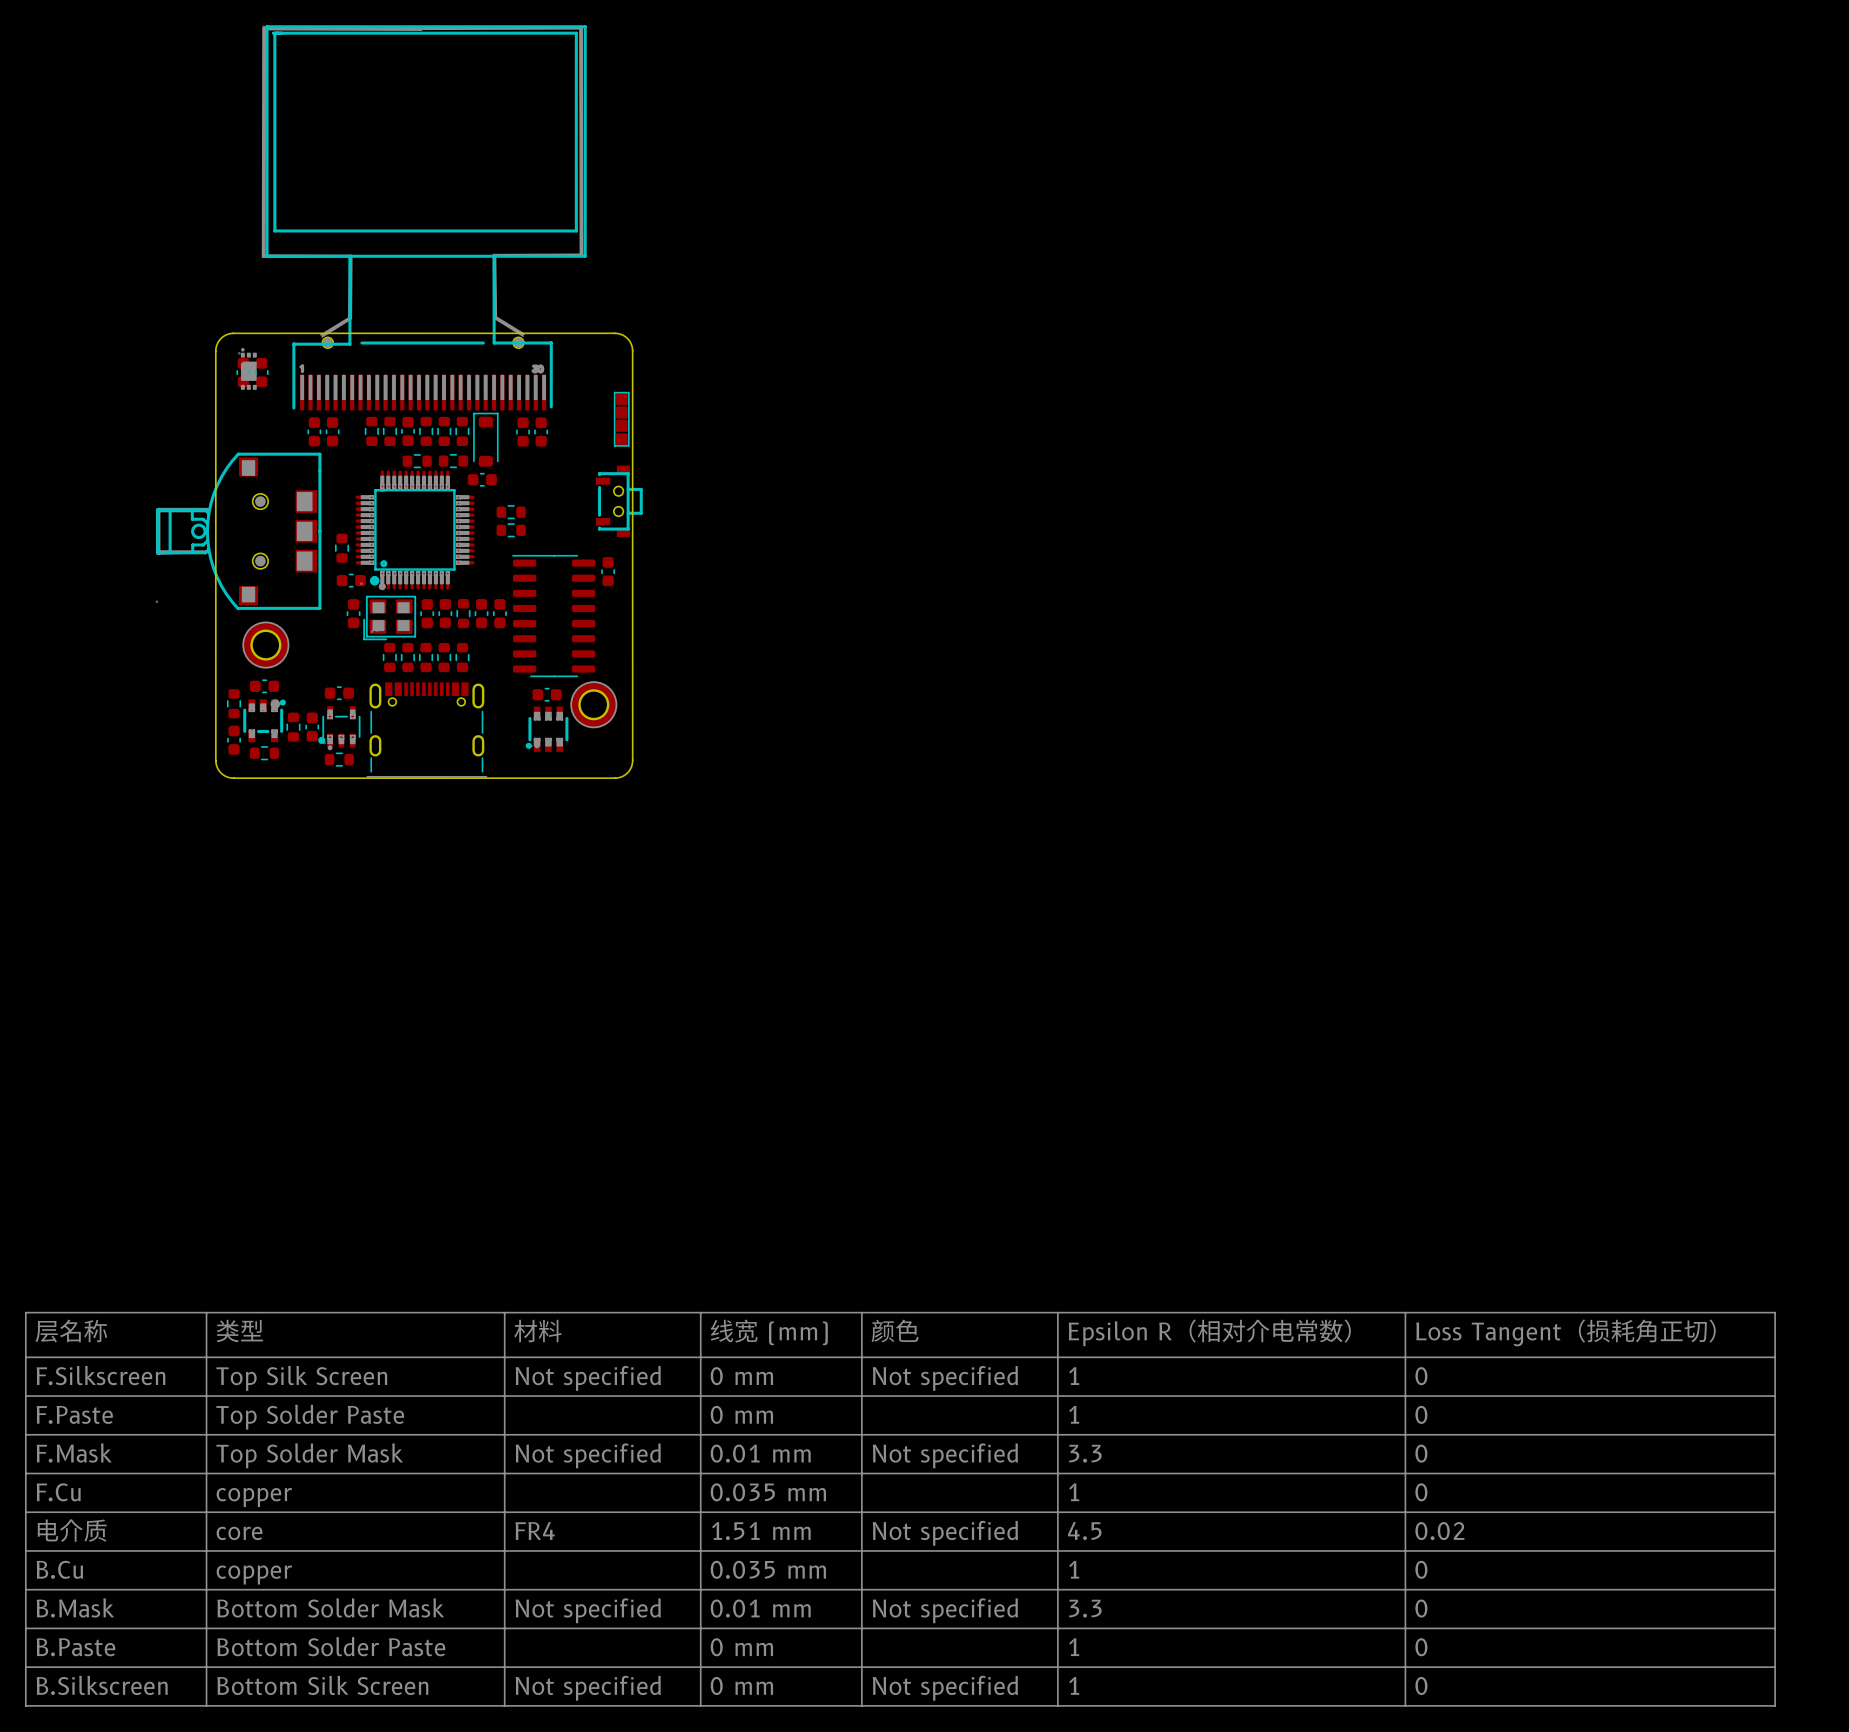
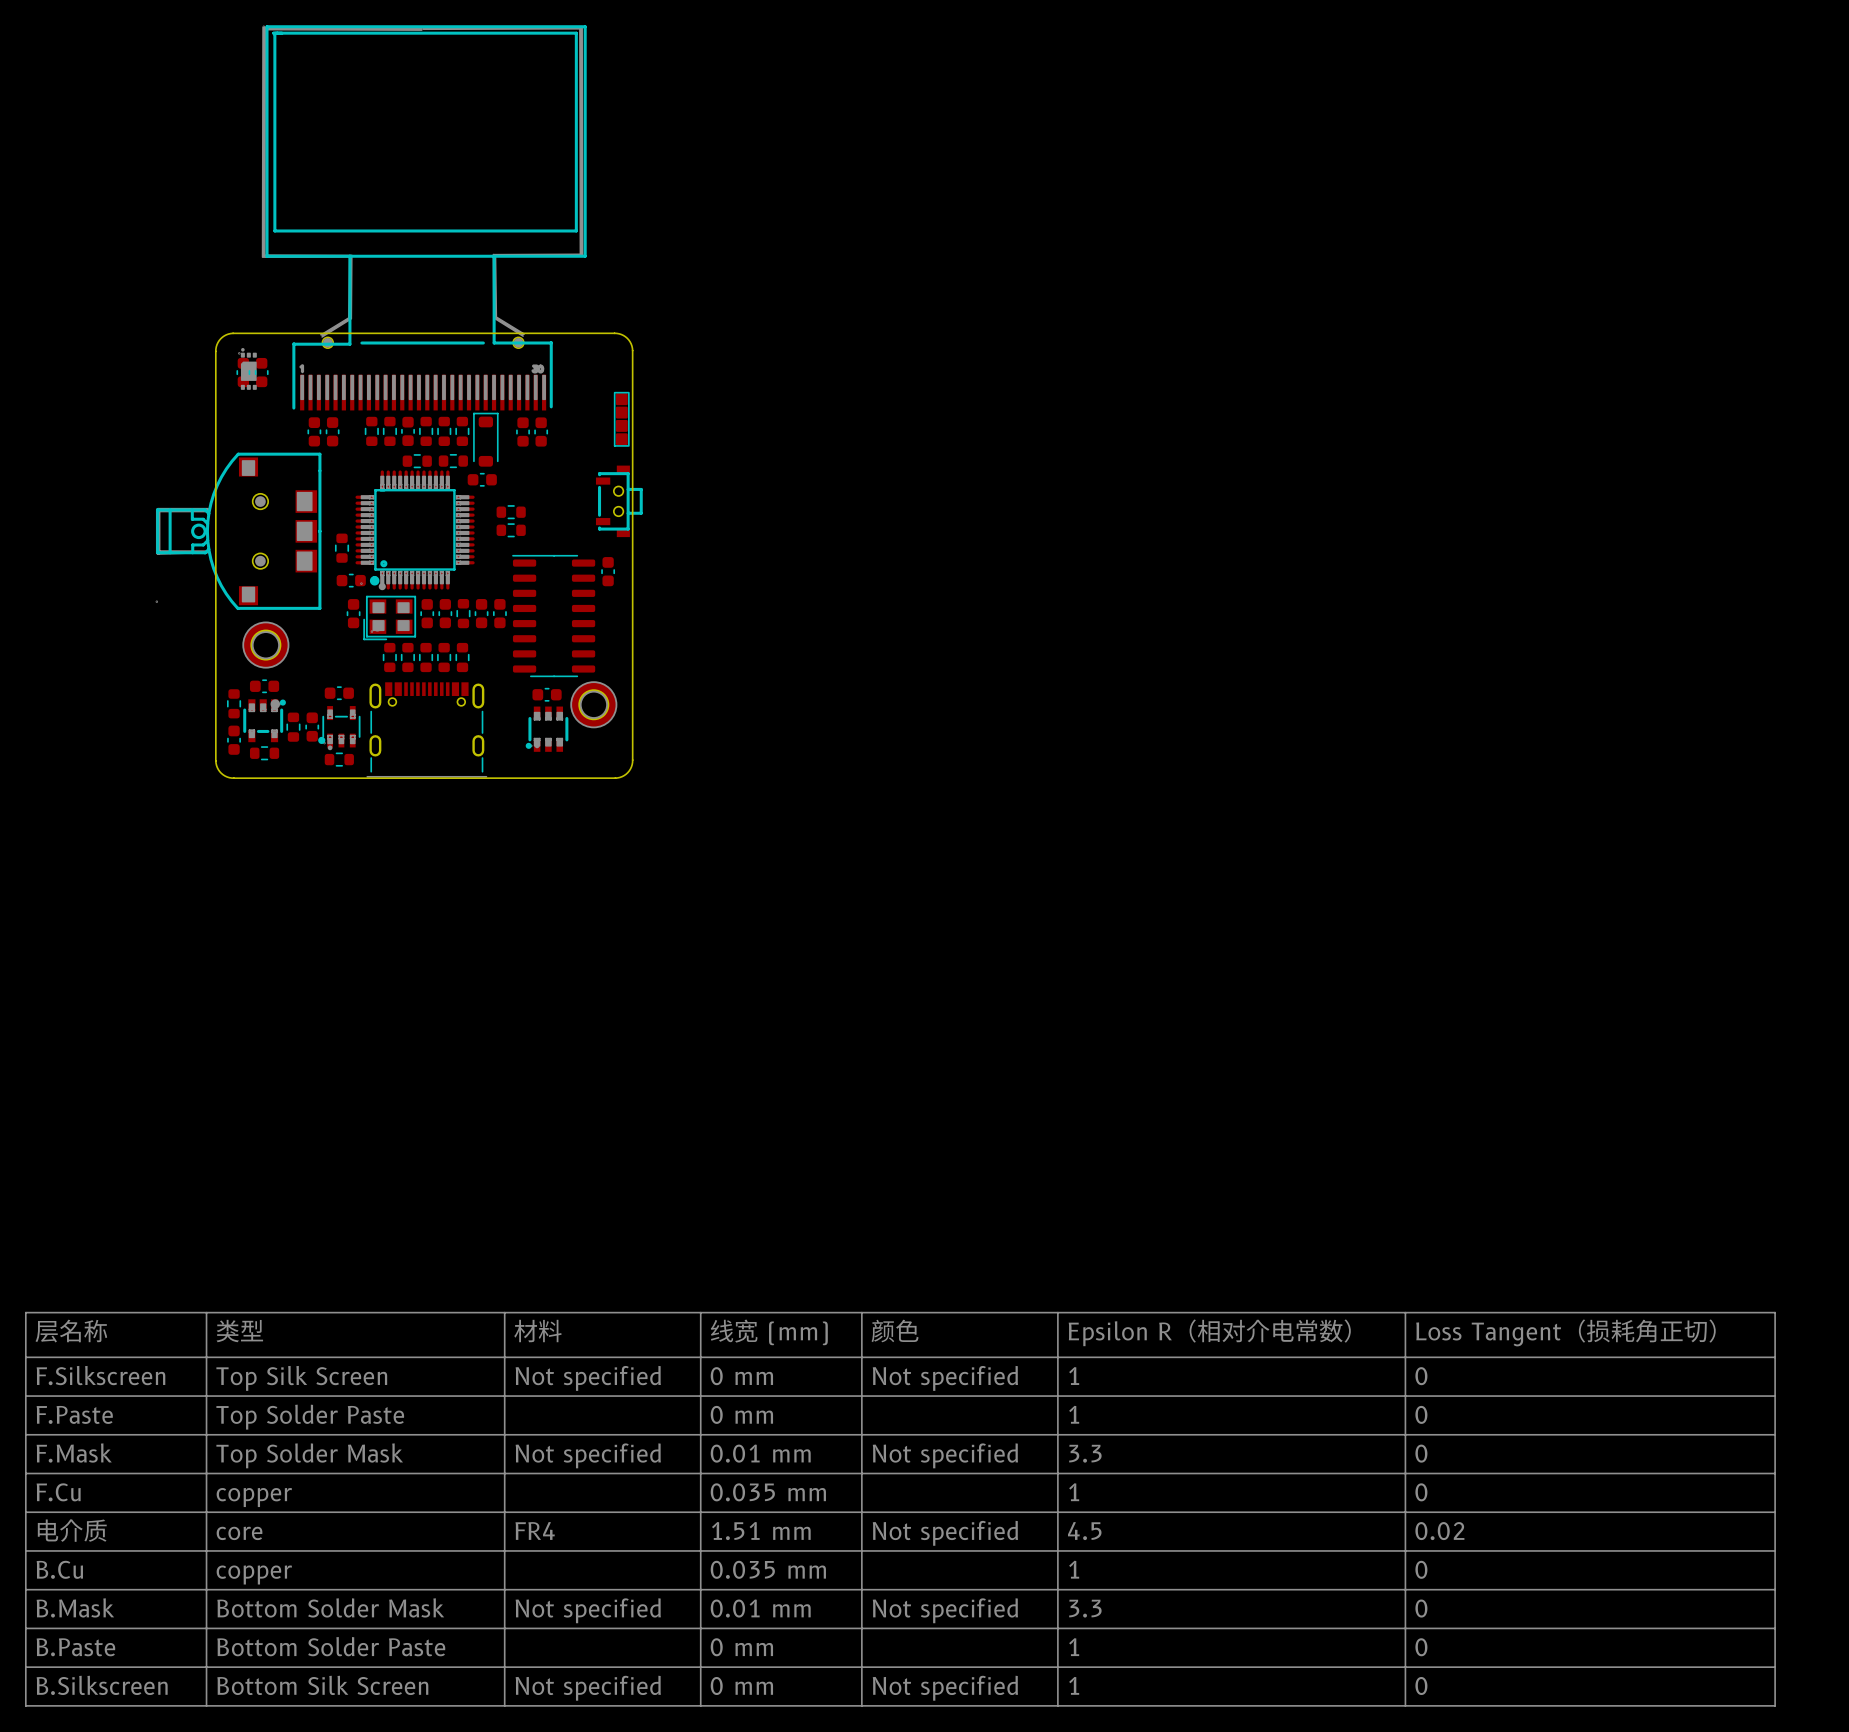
drawing: none -> [251, 631, 280, 660]
drawing: none -> [579, 690, 608, 719]

